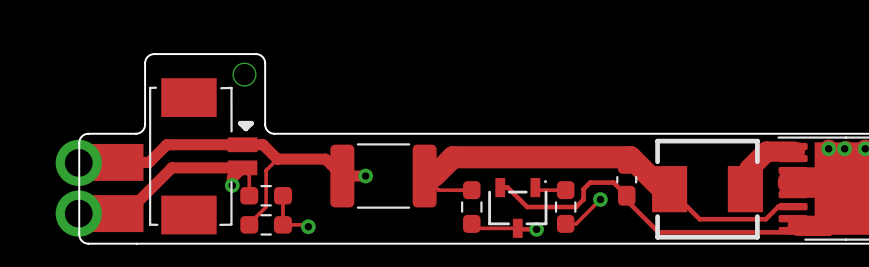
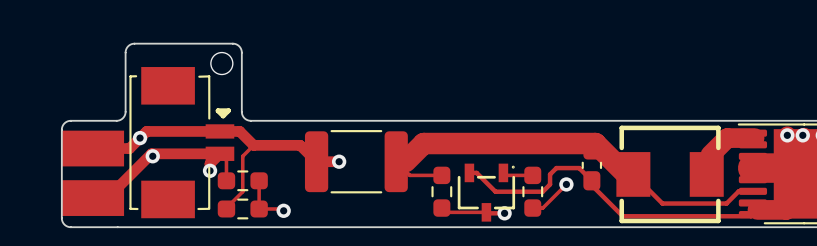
via: none -> (140, 138)
part: (78, 162) -> none
via: none -> (152, 156)
part: (78, 213) -> none

